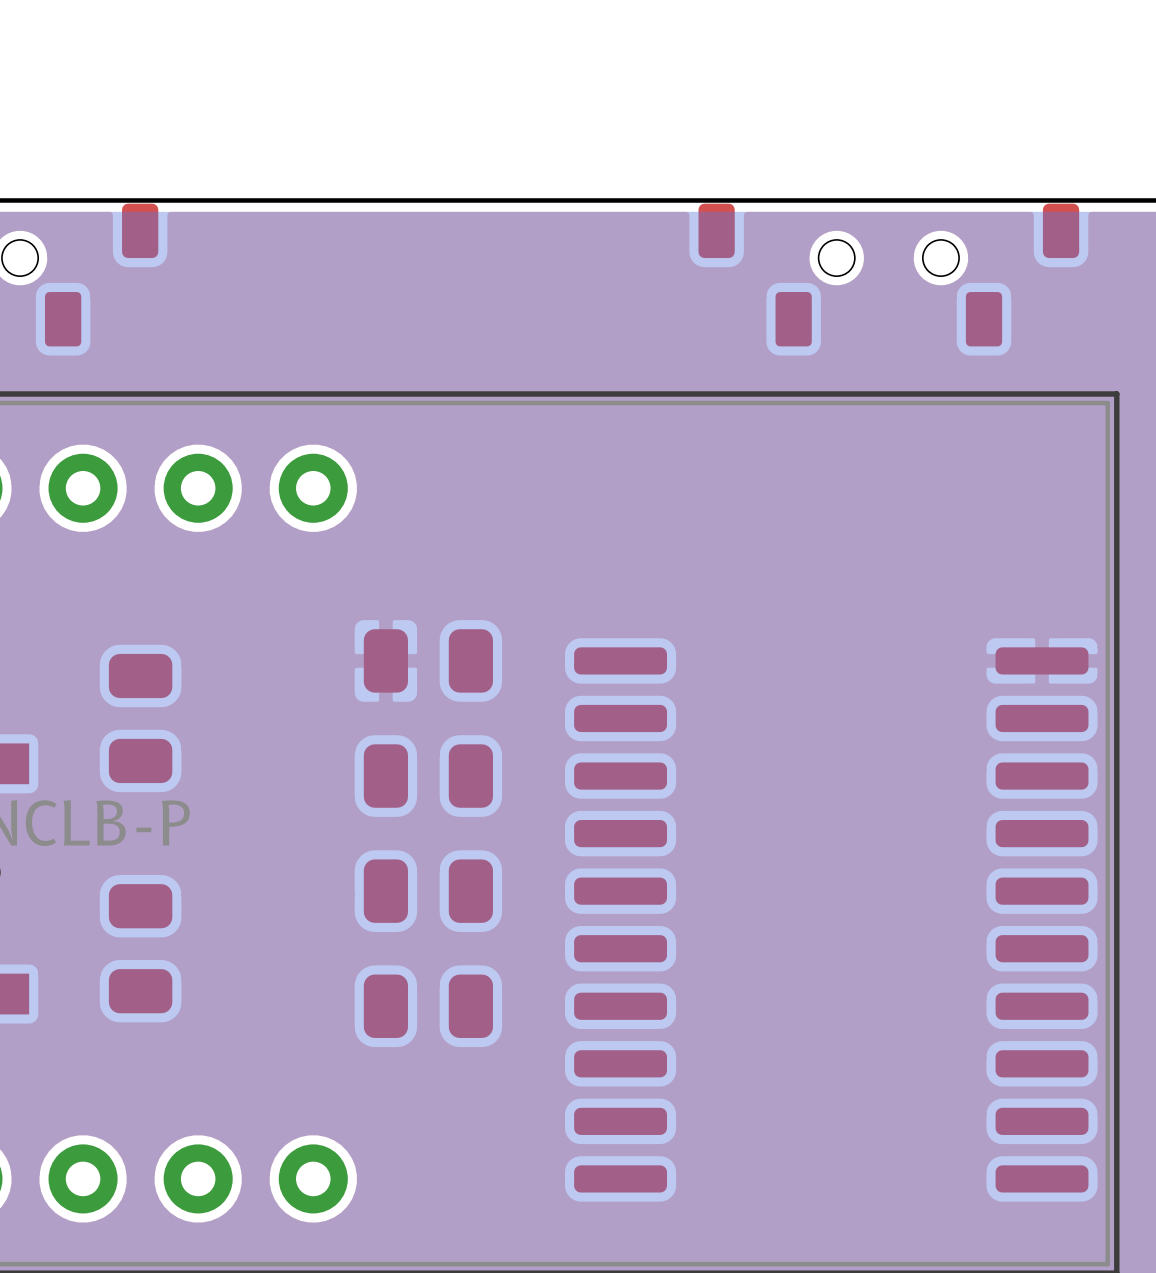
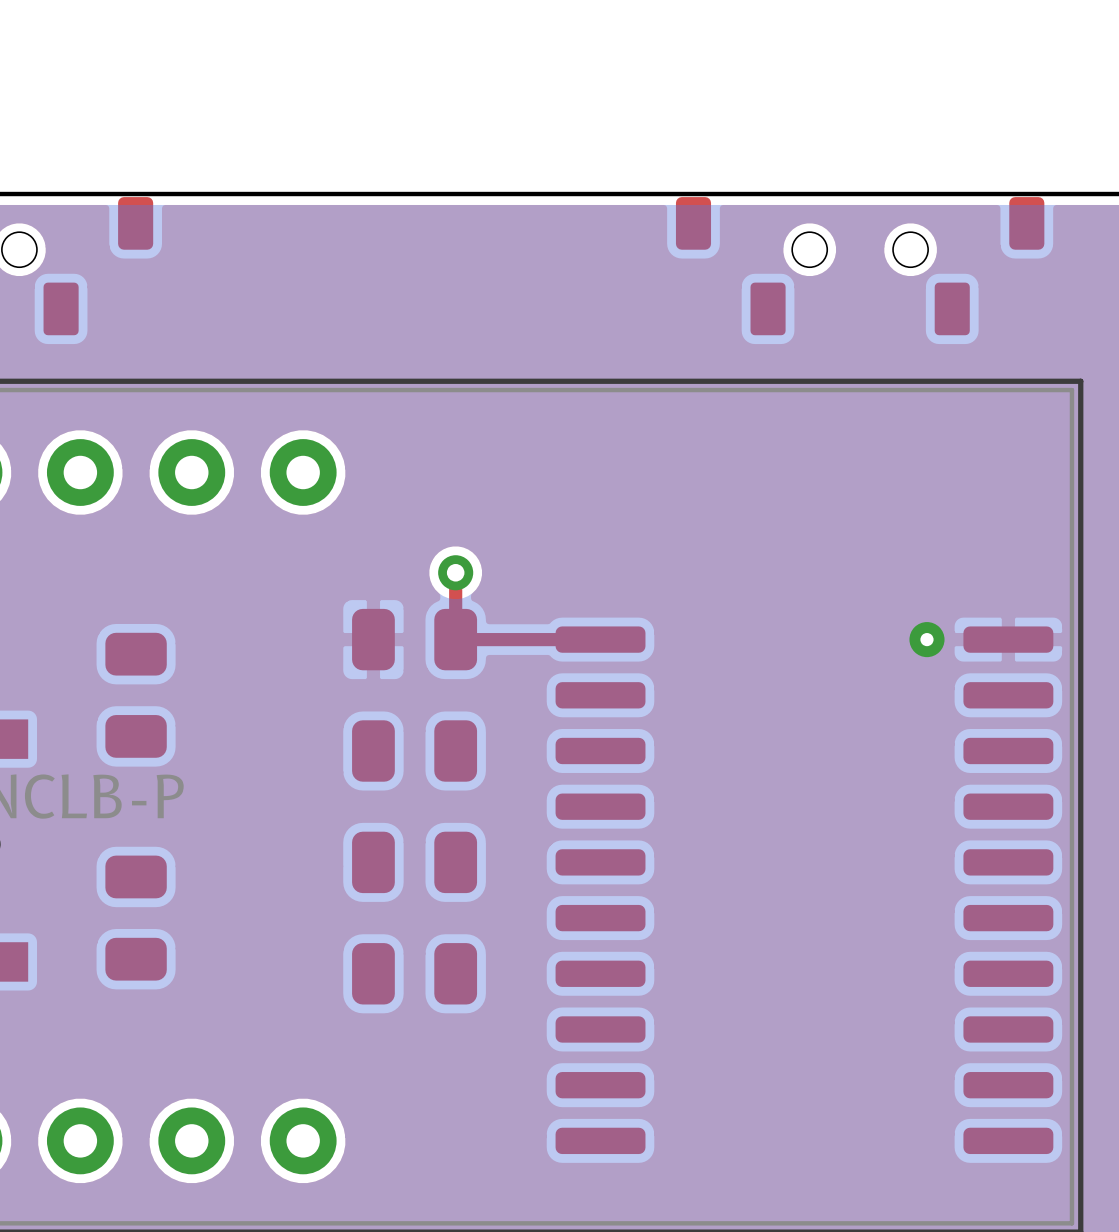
top track: none -> (455, 572) (455, 639) (600, 639)
via: none -> (455, 572)
via: none -> (926, 639)

